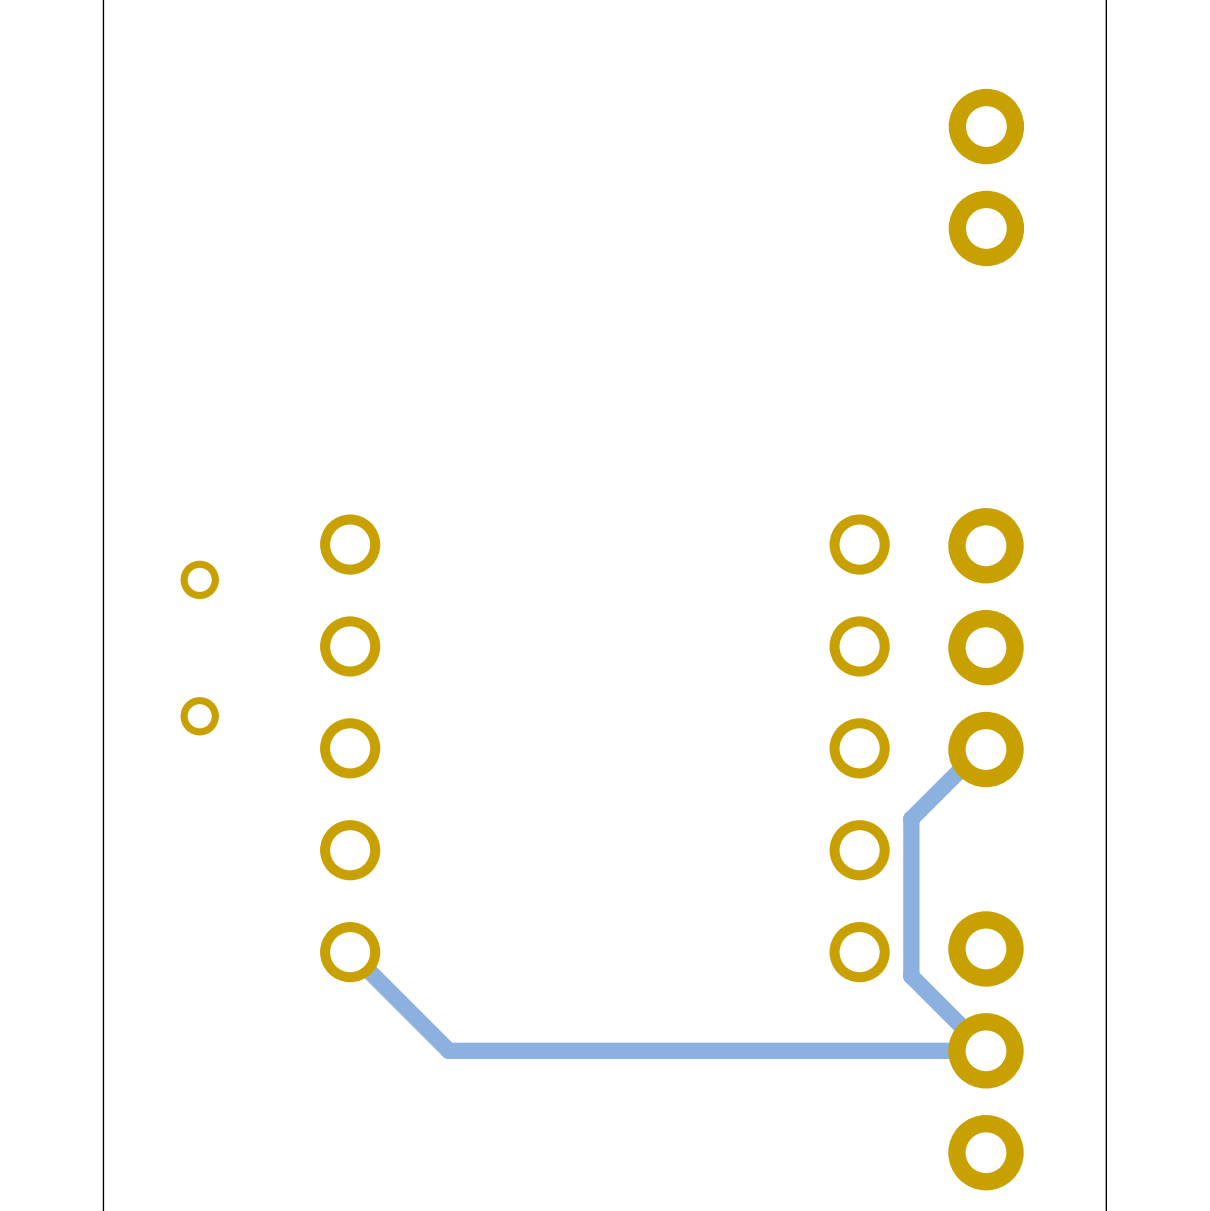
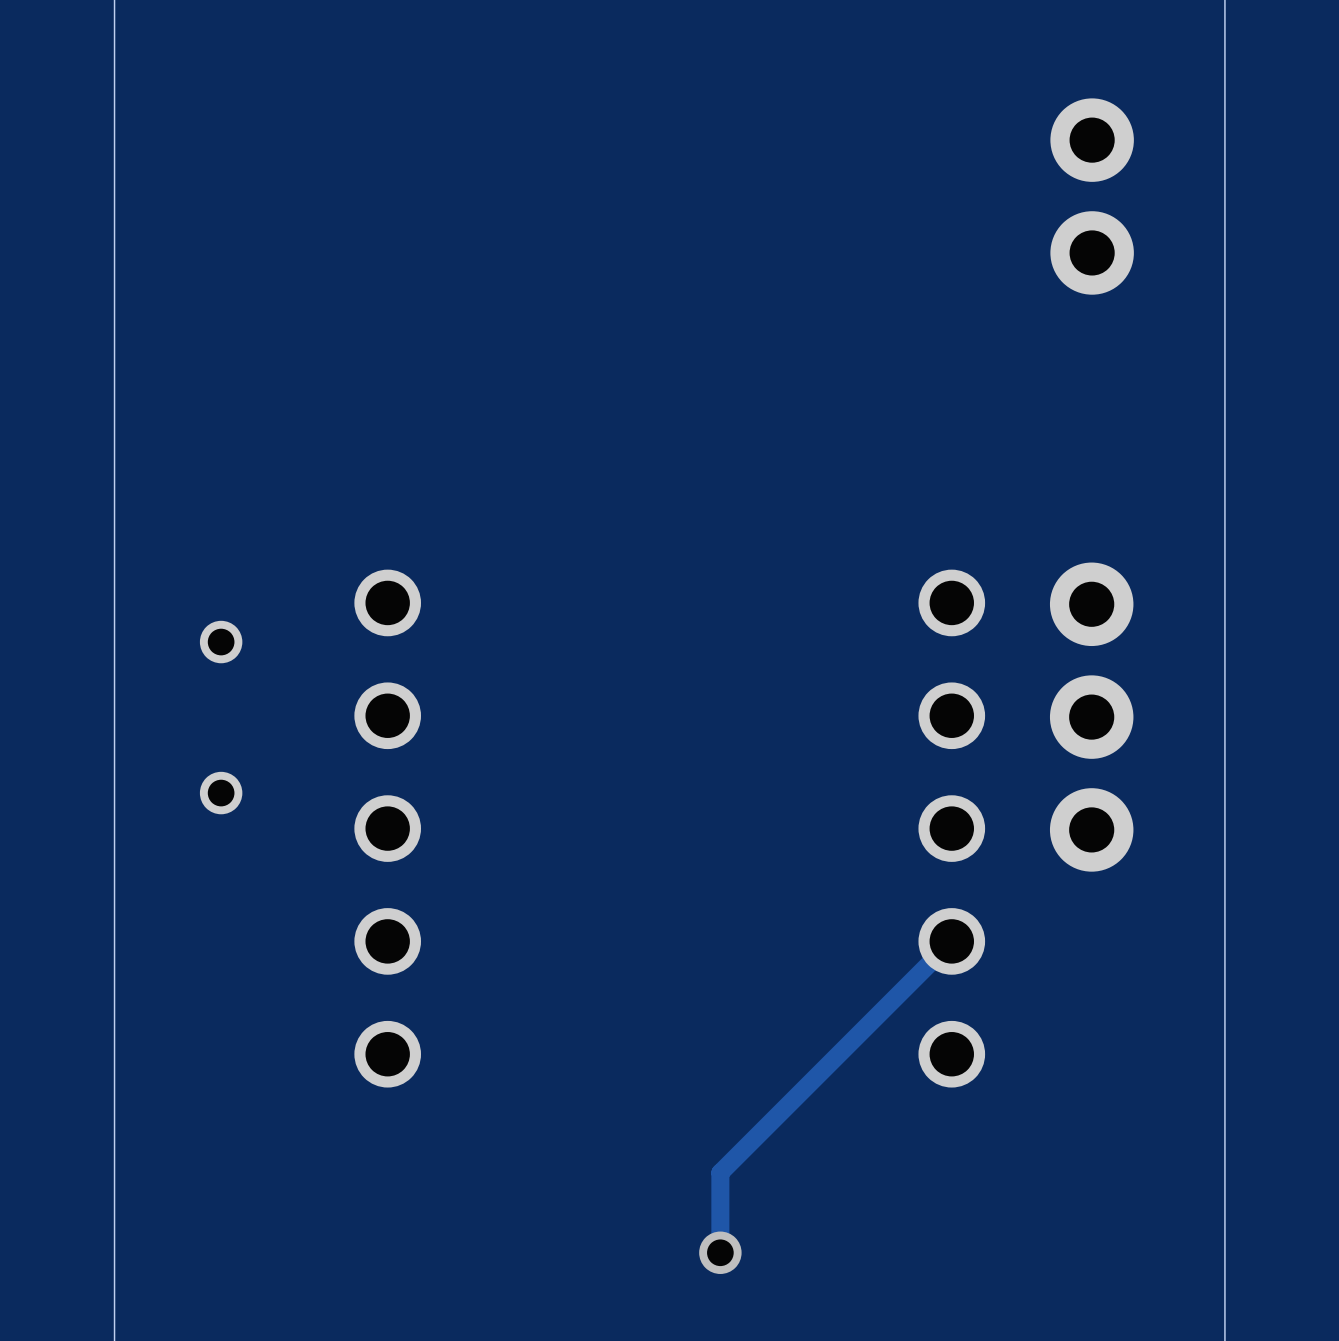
track: (985, 749) (980, 749) (911, 818) (911, 976) (985, 1050) (448, 1050) (350, 952) -> none
track: none -> (951, 941) (720, 1172) (720, 1252)
part: (985, 1050) -> none
via: none -> (720, 1252)

